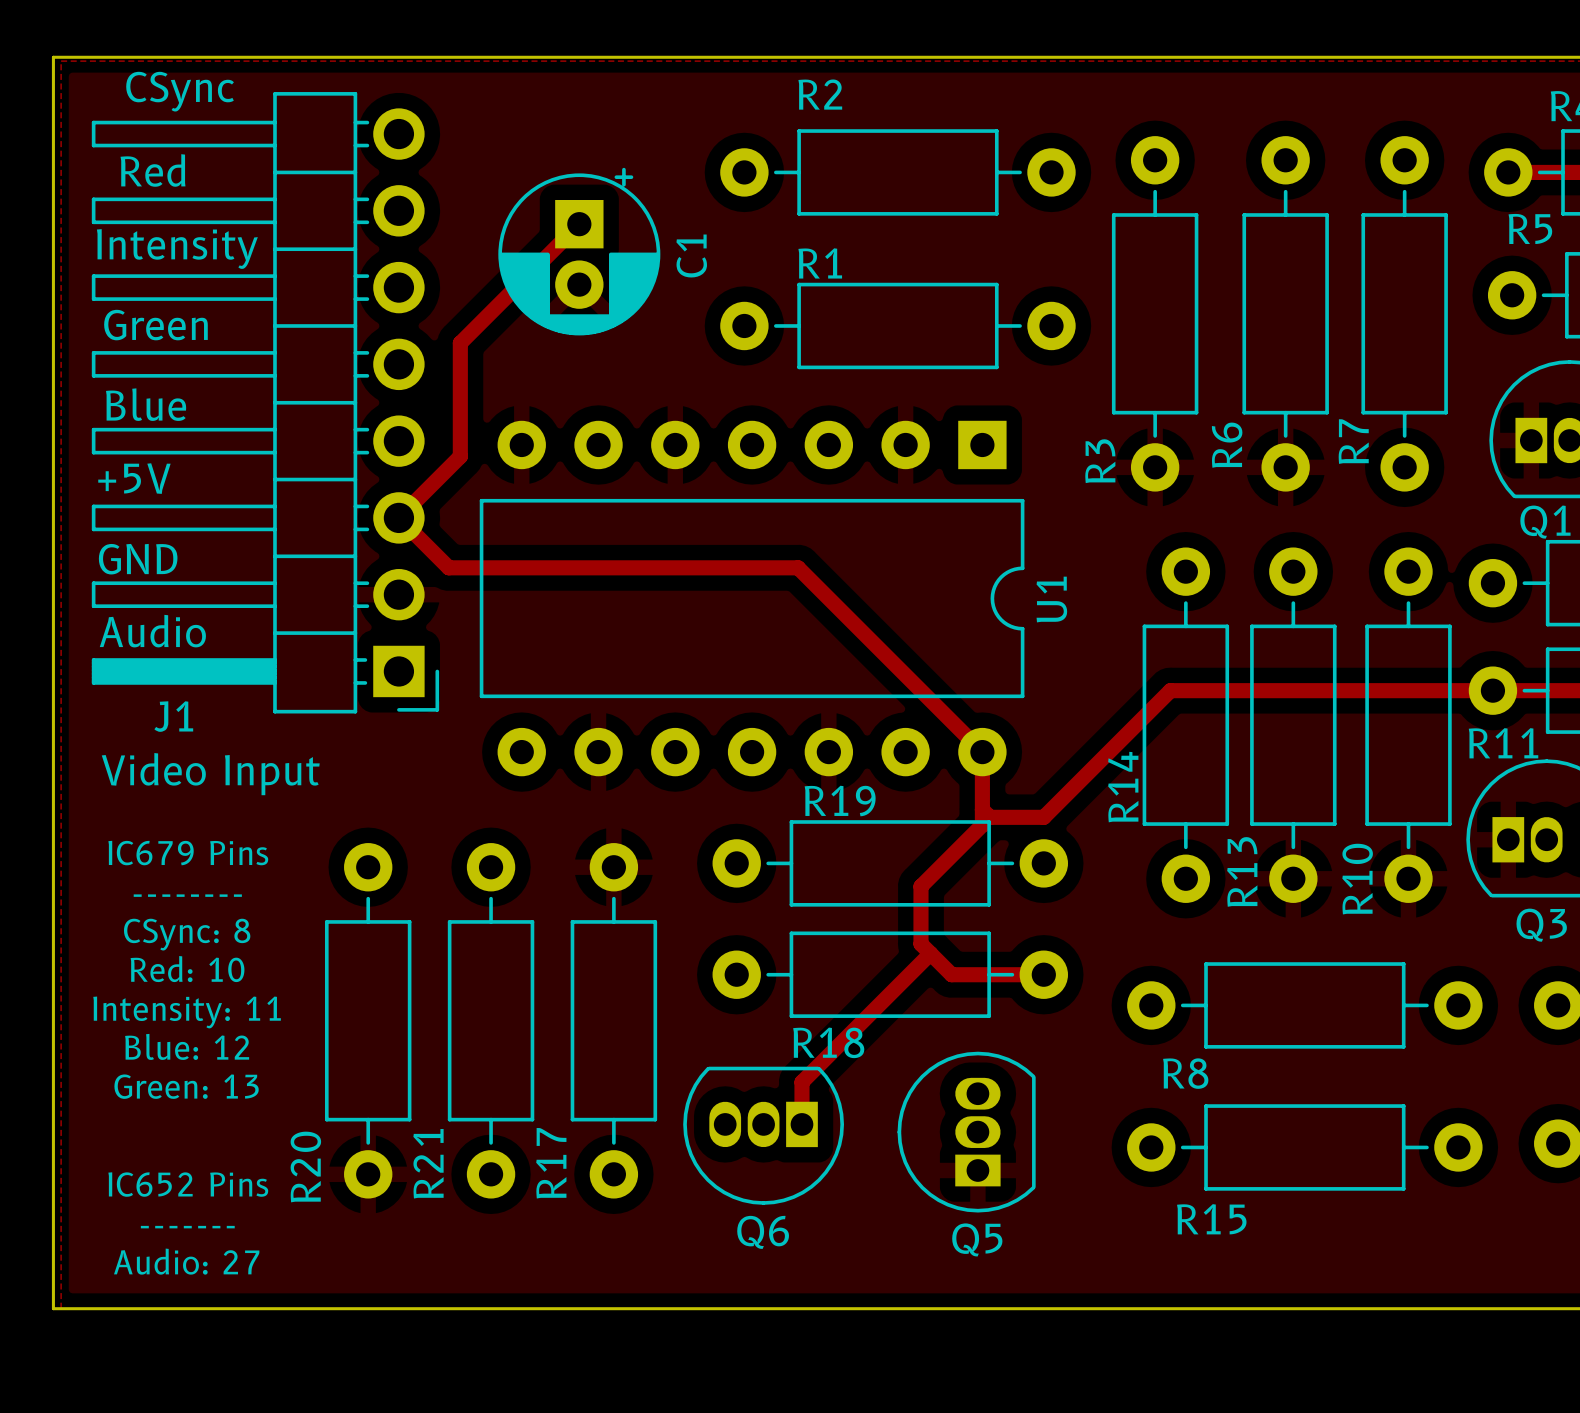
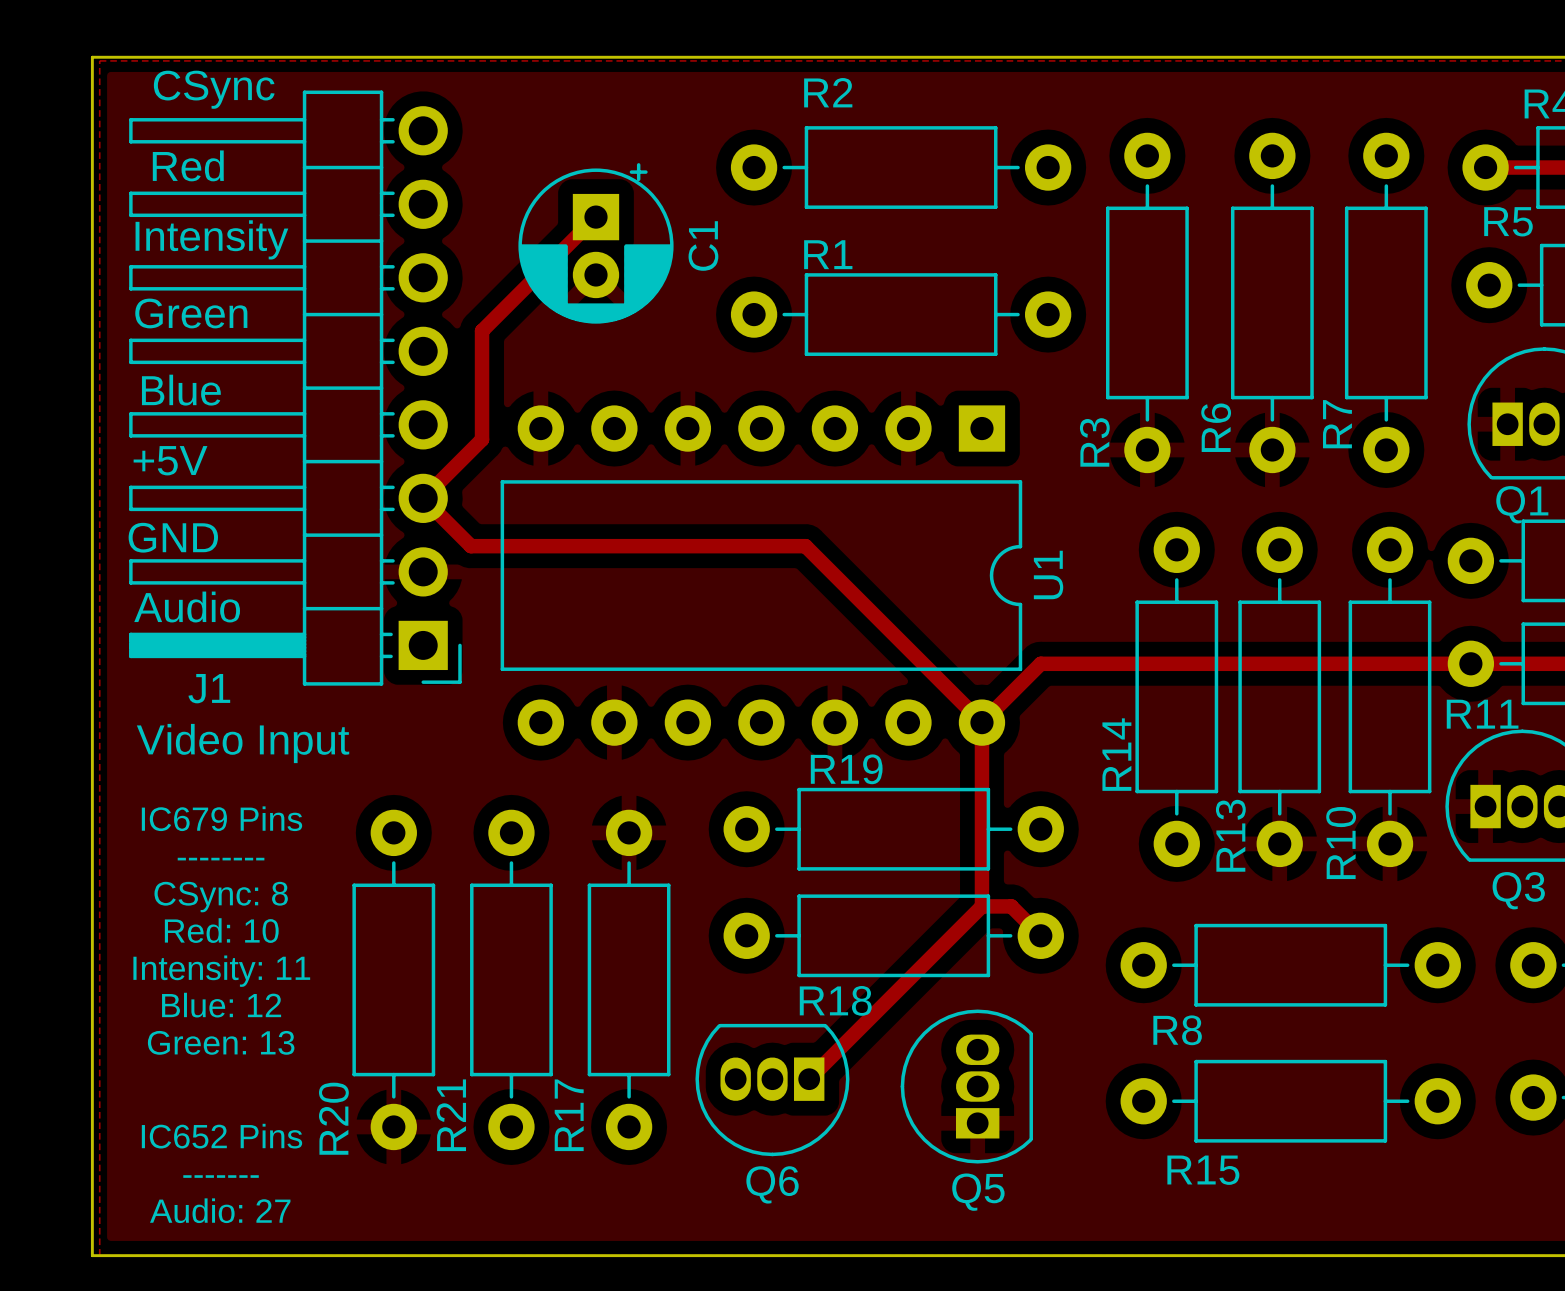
track: (1170, 690) (1043, 817) (990, 817) (982, 809) -> (1162, 663) (1040, 663) (981, 722)
track: (982, 825) (920, 886) (920, 944) (951, 974) (1043, 974) -> (981, 792) (981, 906)
track: none -> (981, 906) (1011, 906) (1040, 935)
track: (930, 953) (801, 1082) (801, 1124) -> (981, 906) (809, 1079)

